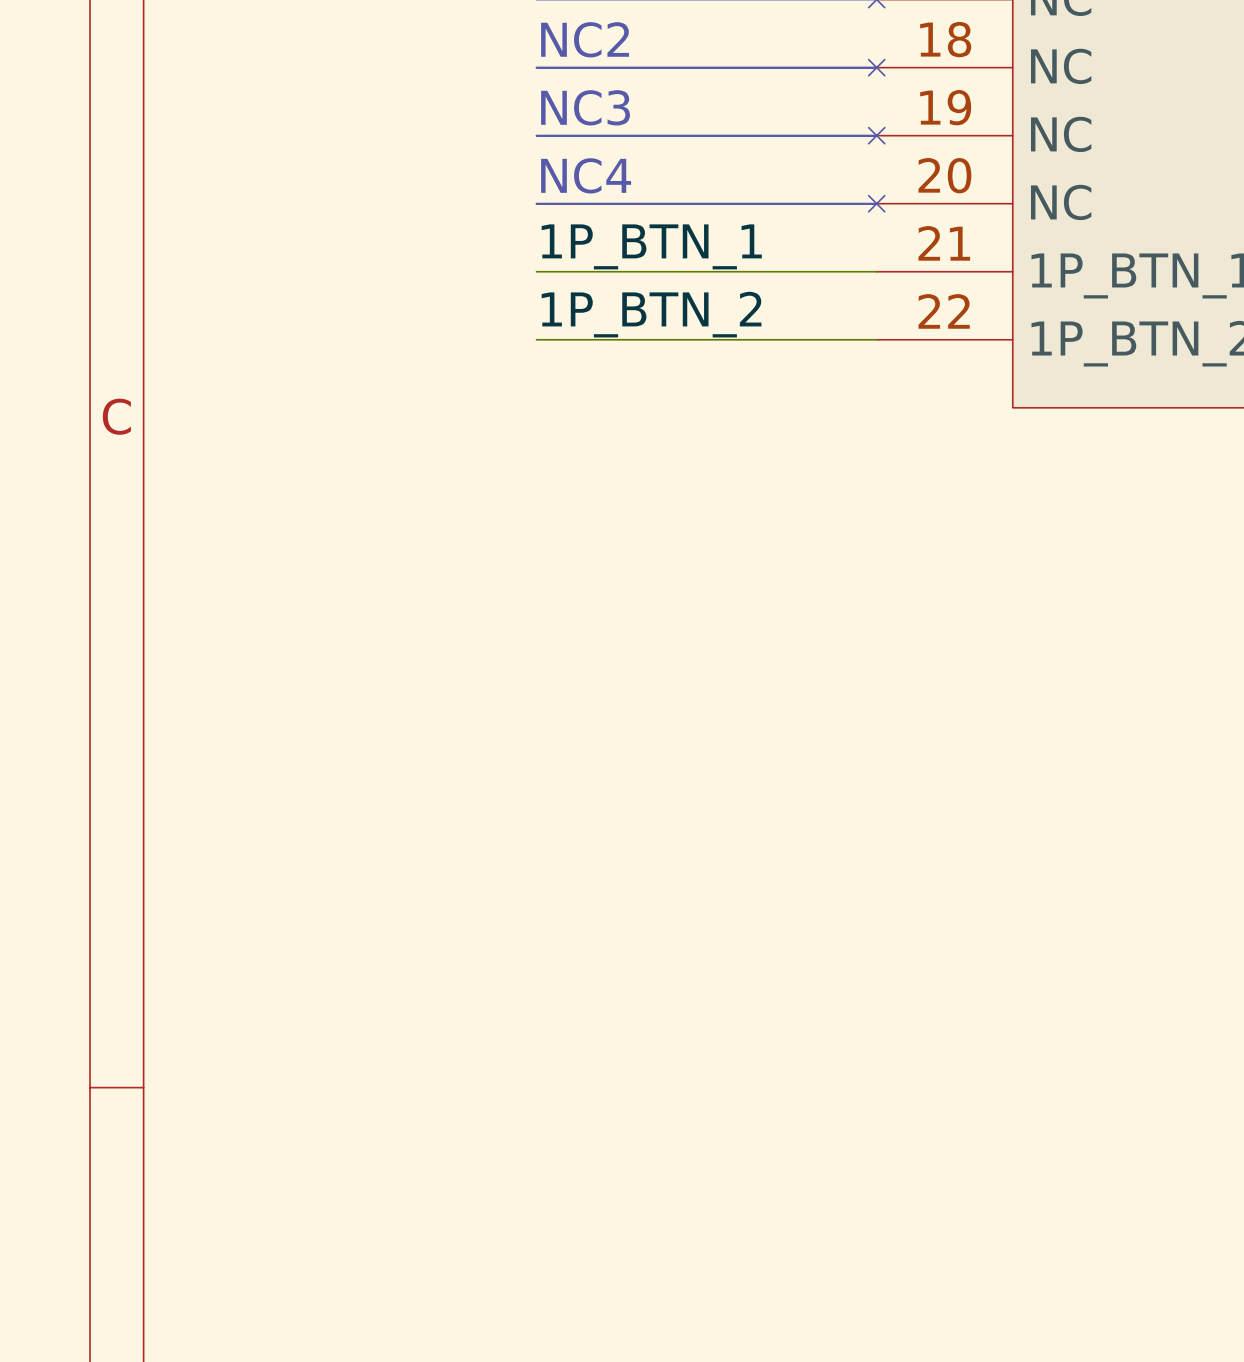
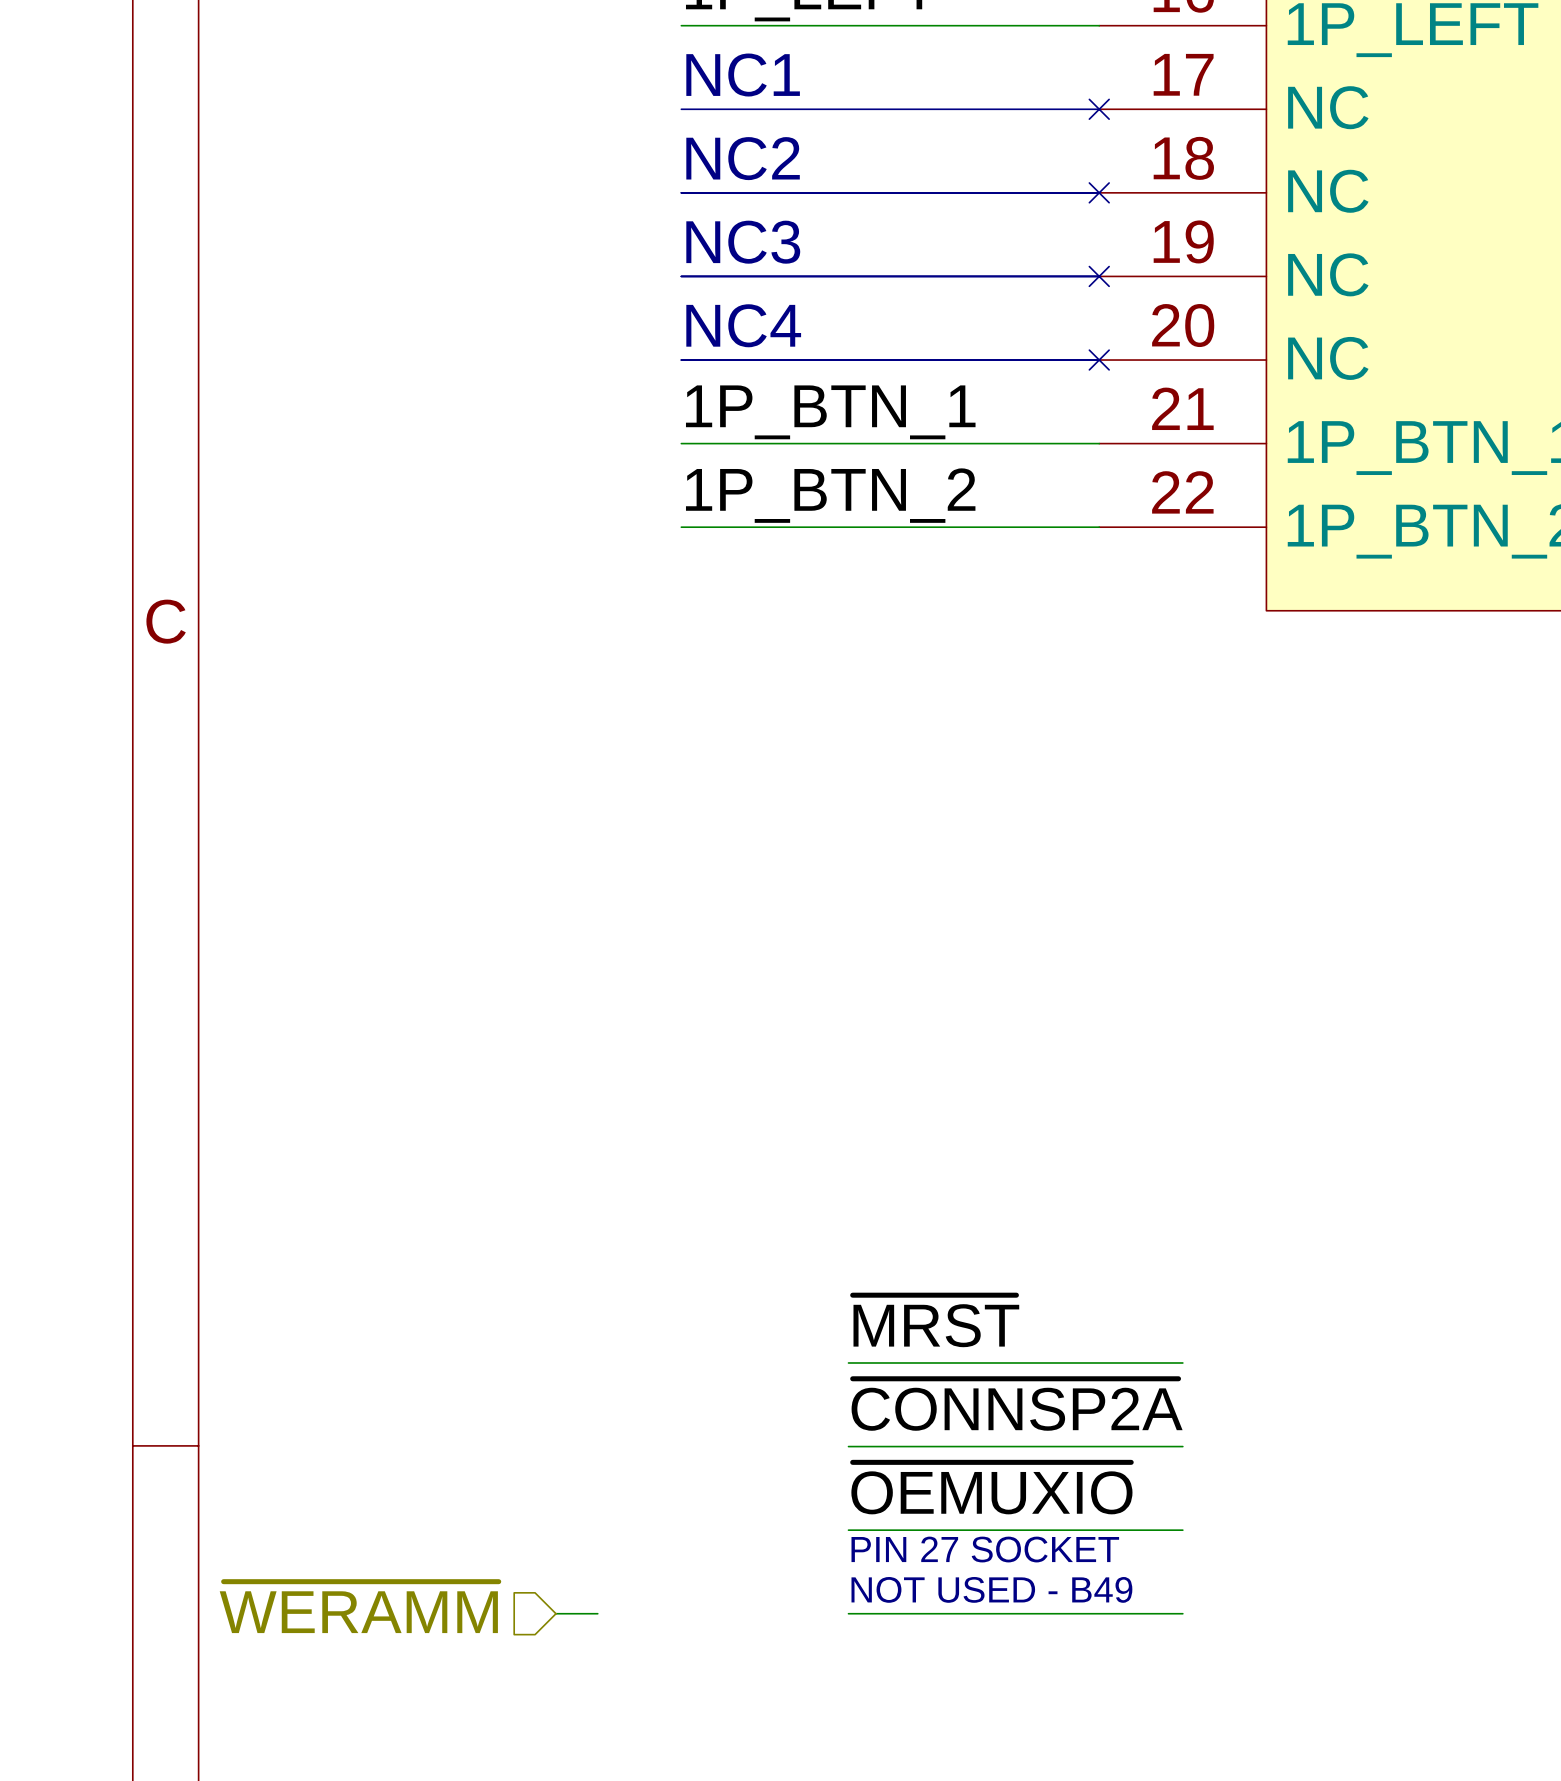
label: none -> ~{MRST} (935, 1321)
wire: none -> (848, 1362) (1182, 1362)
label: none -> ~{CONNSP2A} (1017, 1404)
wire: none -> (848, 1446) (1182, 1446)
label: none -> ~{OEMUXIO} (991, 1488)
wire: none -> (848, 1530) (1182, 1530)
text: none -> PIN 27 SOCKET (985, 1549)
text: none -> NOT USED - B49 (991, 1589)
hierarchical label: none -> ~{WERAMM} (359, 1607)
wire: none -> (555, 1613) (597, 1613)
wire: none -> (848, 1613) (1182, 1613)

